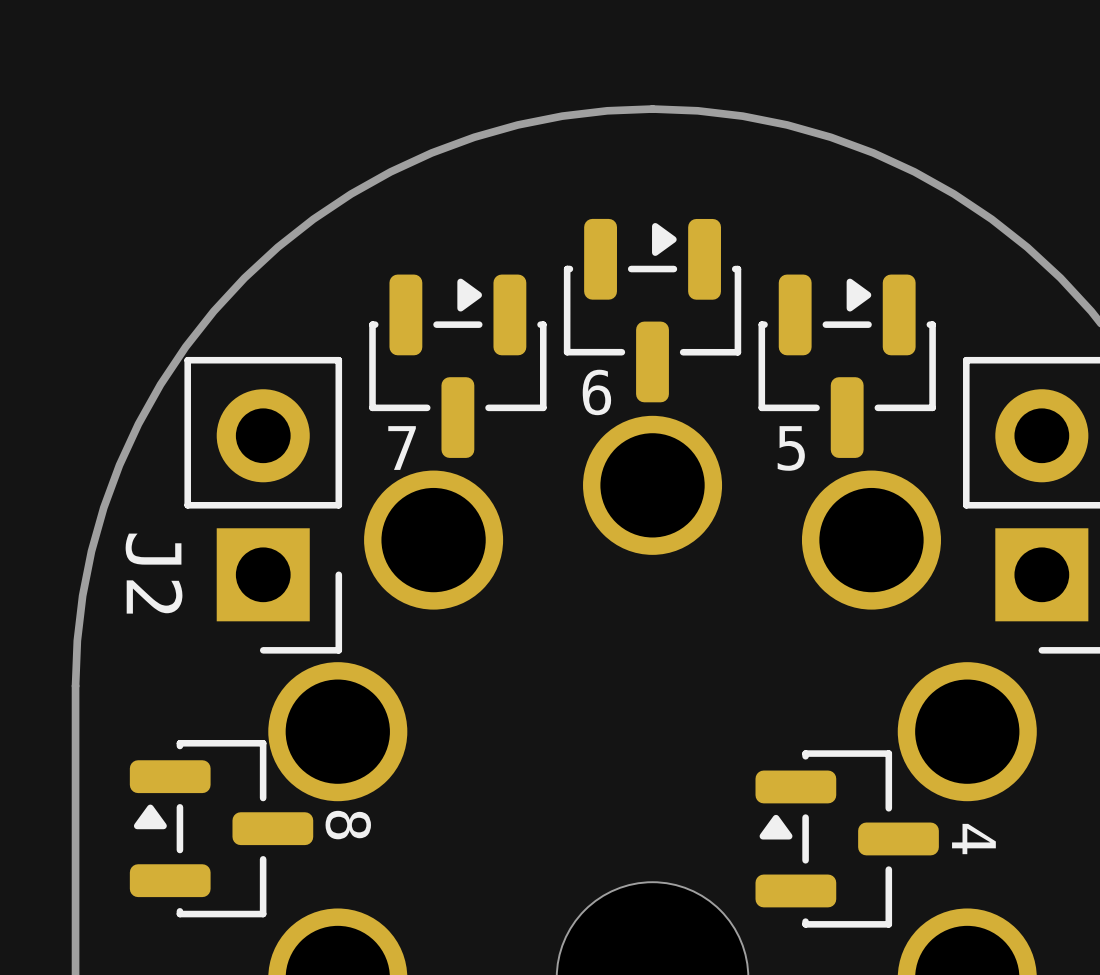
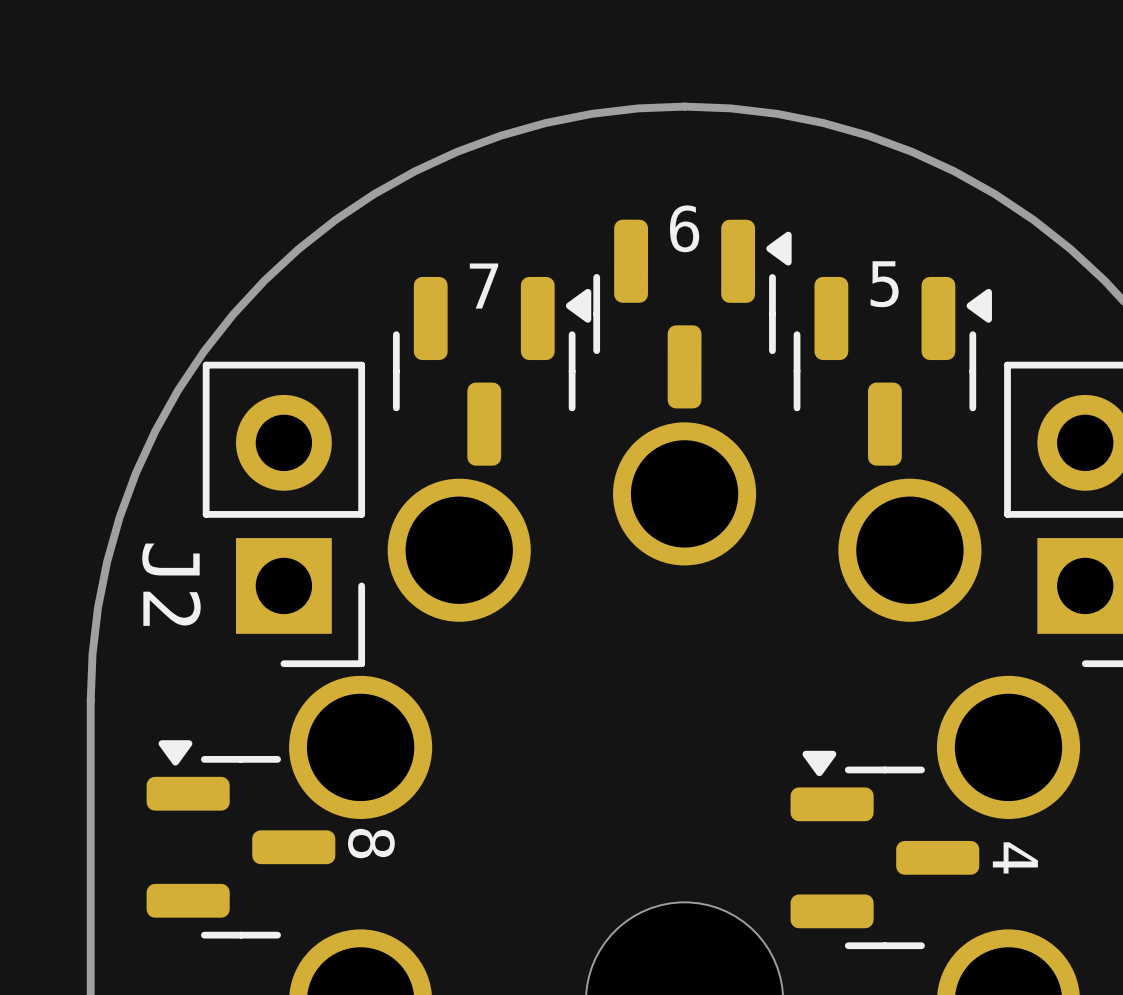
part footprint: [563, 218, 742, 403] -> [593, 219, 792, 409]
part footprint: [369, 274, 547, 458] -> [392, 276, 592, 466]
part footprint: [758, 274, 936, 458] -> [793, 276, 992, 466]
text position: 6 (596, 392) -> 6 (684, 228)
text position: 7 (402, 448) -> 7 (484, 286)
text position: 5 (791, 448) -> 5 (884, 284)
part footprint: [129, 739, 314, 918] -> [146, 740, 336, 939]
part footprint: [755, 750, 939, 928] -> [790, 750, 980, 950]

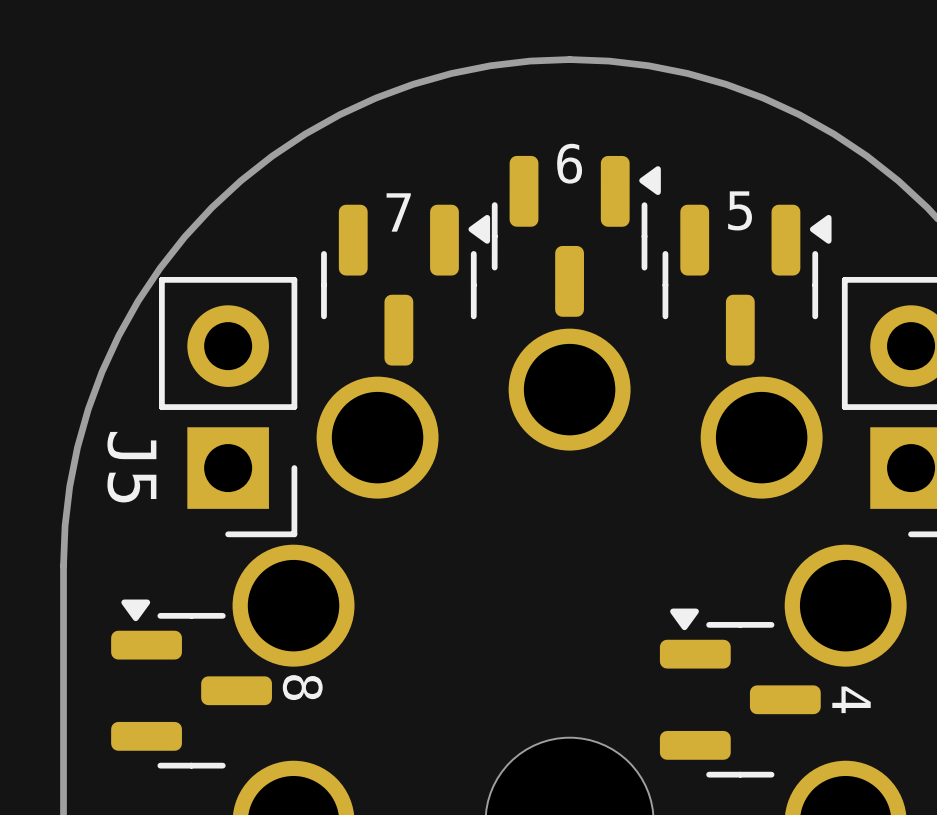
J2 name: J2 (171, 584) -> J5 (131, 467)

